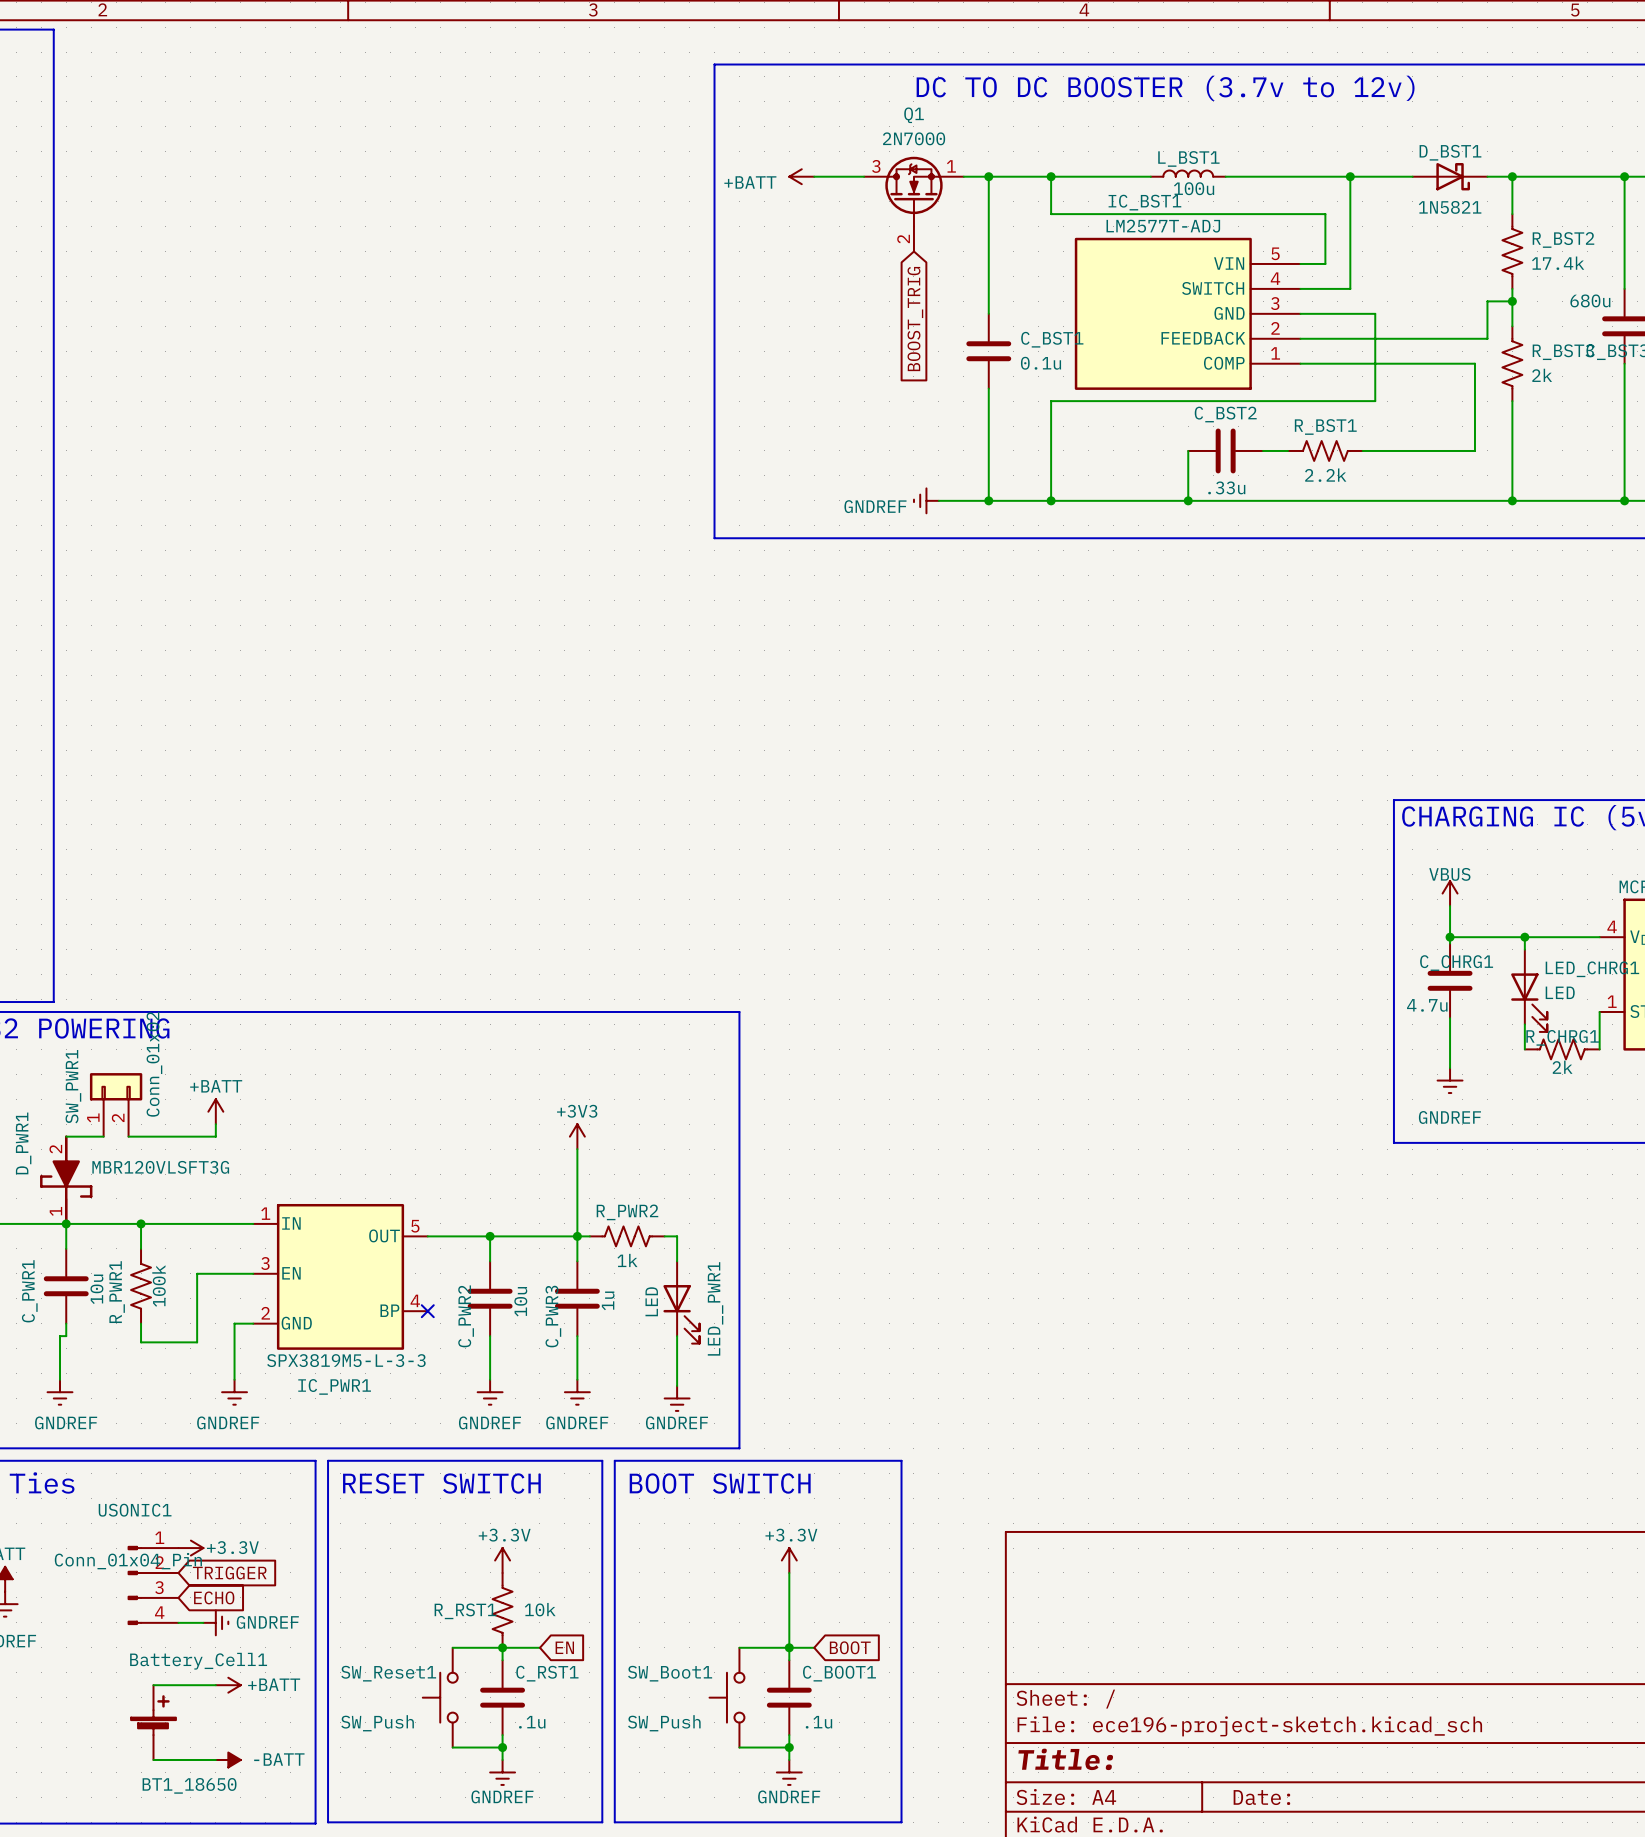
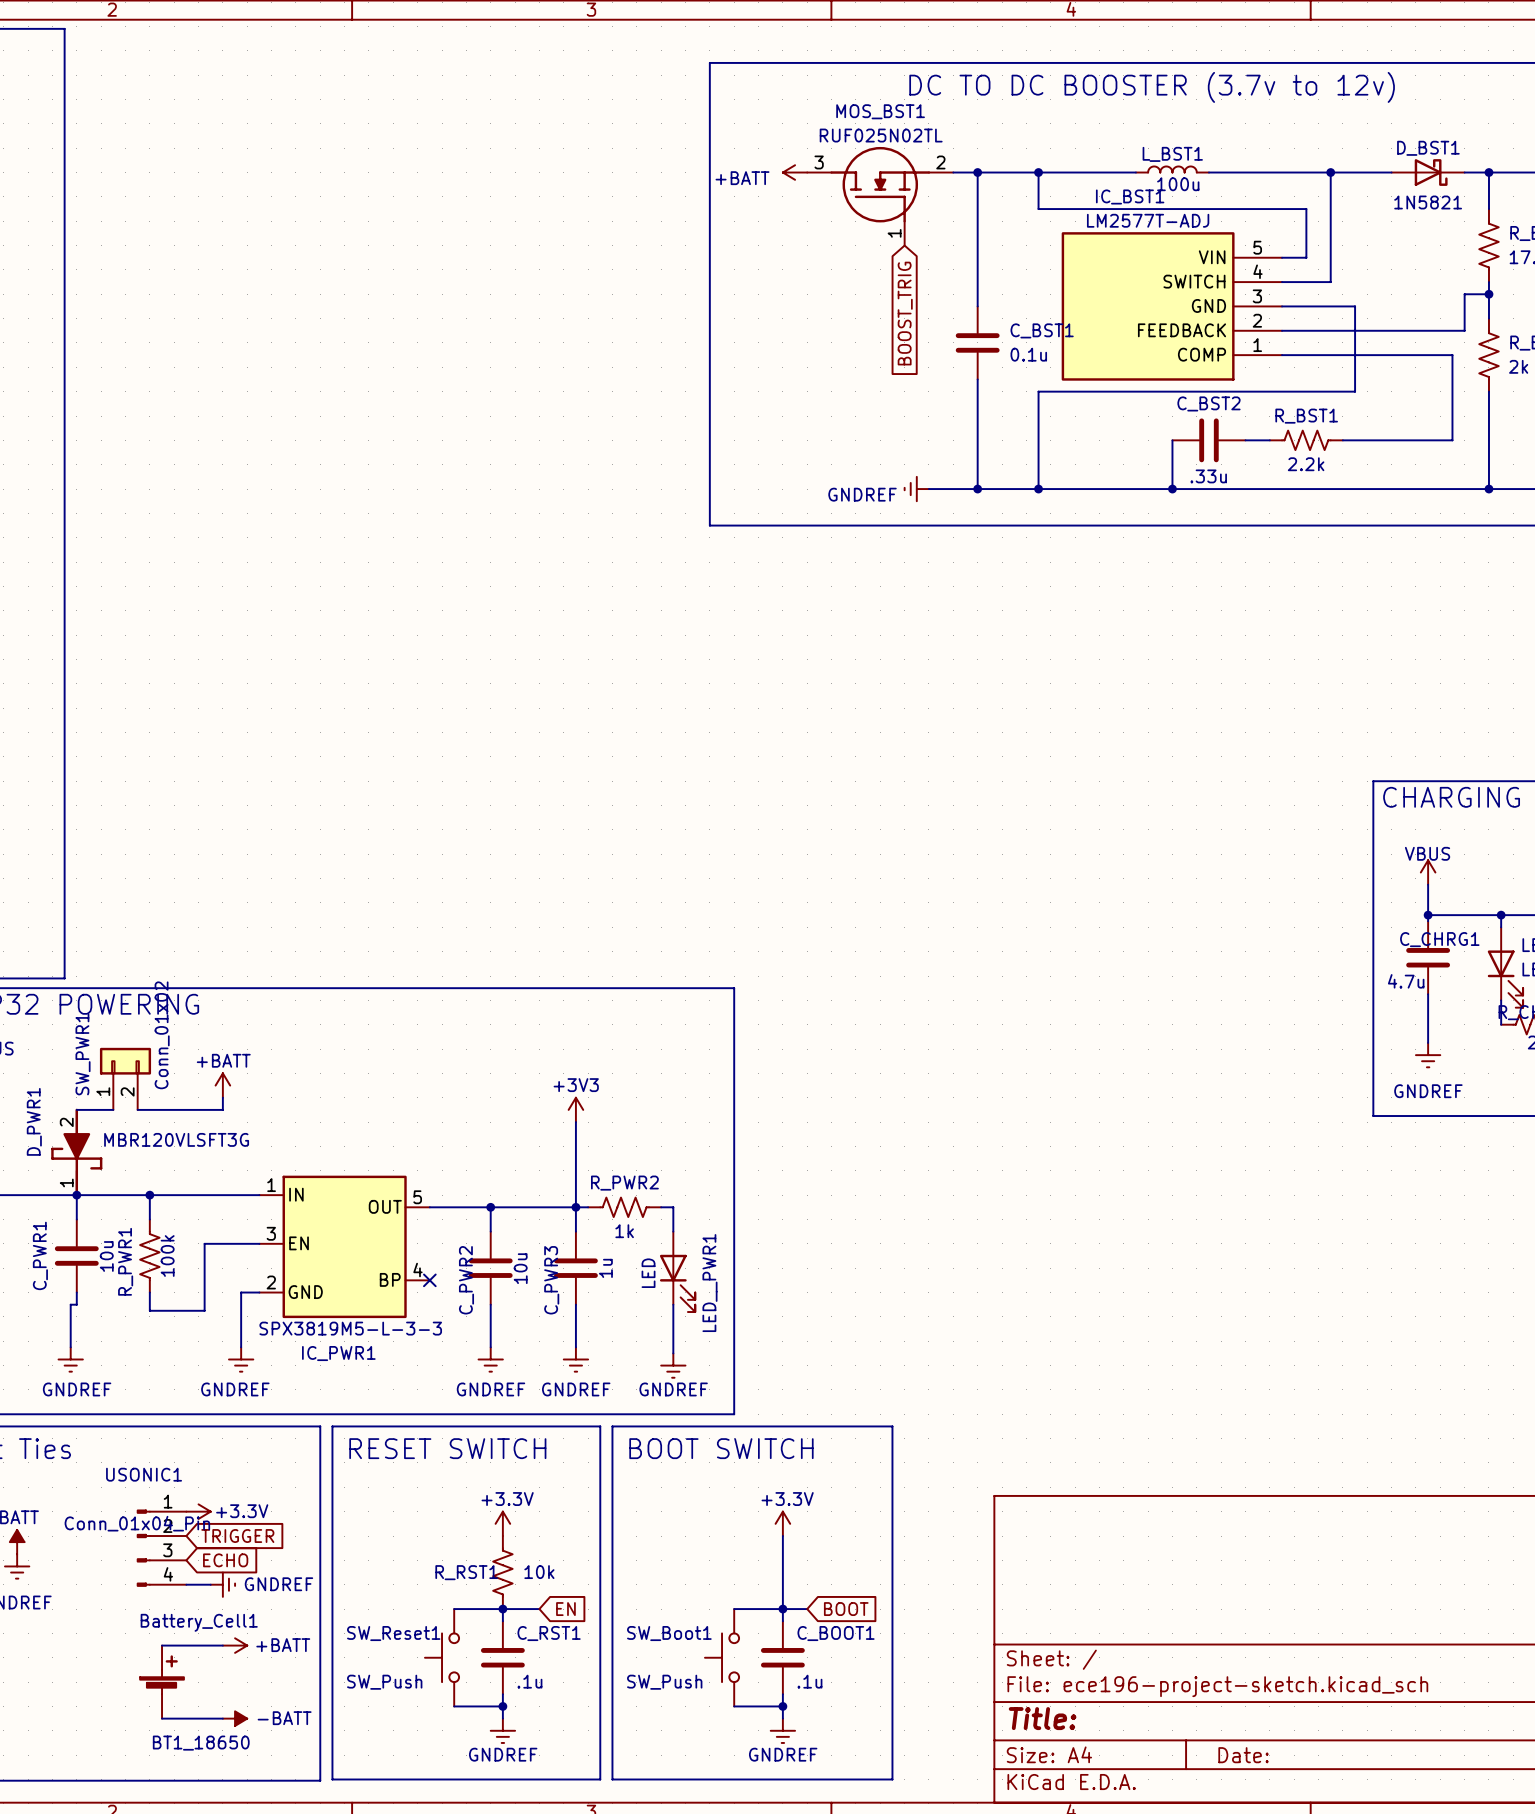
MOS_BST1: none -> RUF025N02TL (880, 196)
Q1: 2N7000 (913, 204) -> none

